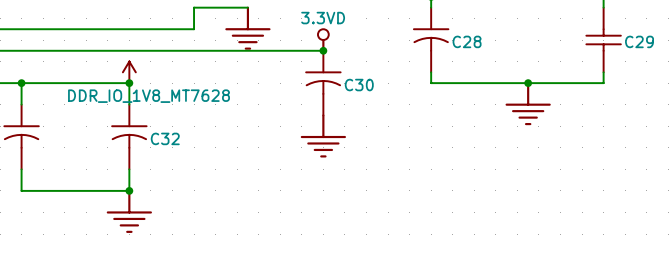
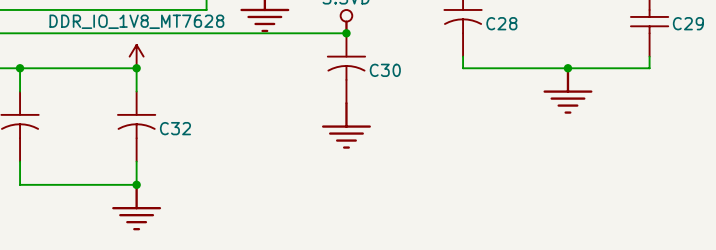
power symbol text position: DDR_IO_1V8_MT7628 (149, 96) -> DDR_IO_1V8_MT7628 (136, 21)

